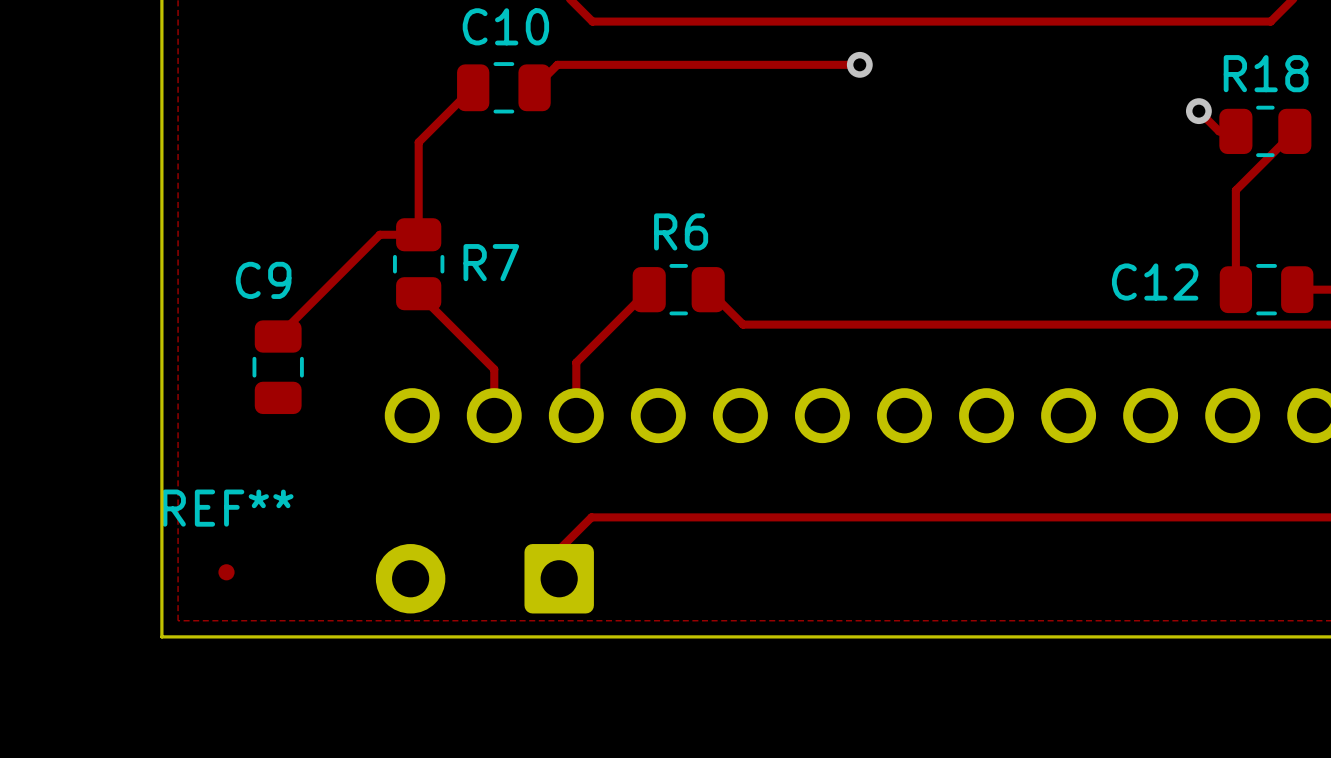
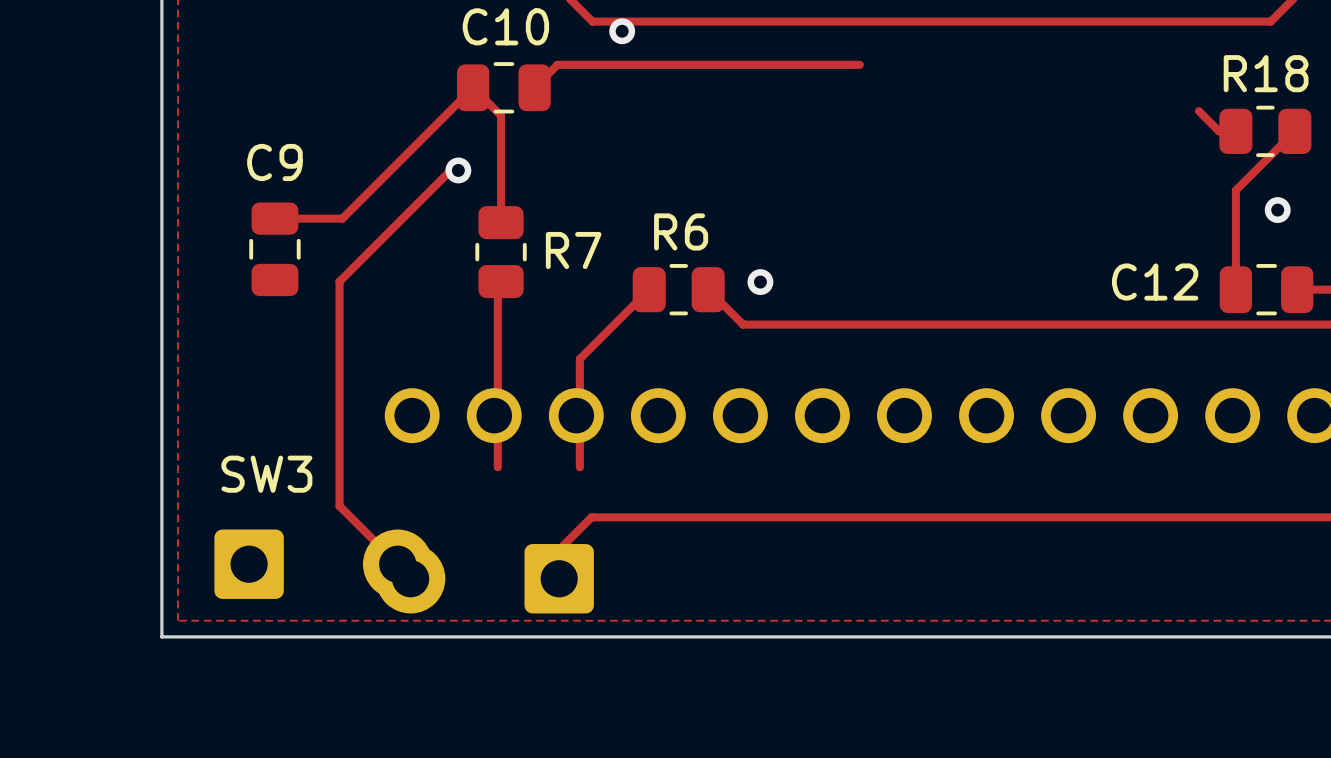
via: none -> (622, 31)
via: (859, 64) -> none
track: none -> (473, 87) (501, 115) (501, 222)
via: (1198, 111) -> none
track: (418, 142) (418, 234) (379, 234) (278, 336) -> (418, 142) (342, 218) (274, 218)
track: none -> (458, 170) (452, 168) (339, 281) (339, 506) (397, 564)
via: none -> (458, 170)
via: none -> (1277, 210)
R7 position: (418, 264) -> (501, 252)
C9 name position: C9 (263, 280) -> C9 (274, 162)
track: none -> (501, 281) (497, 284) (497, 467)
via: none -> (760, 282)
track: (418, 293) (494, 369) (494, 415) -> none
track: (579, 359) (576, 362) (576, 415) -> (579, 359) (579, 467)
C9 position: (278, 367) -> (274, 249)
SW3: none -> (323, 564)
REF**: (226, 572) -> none

